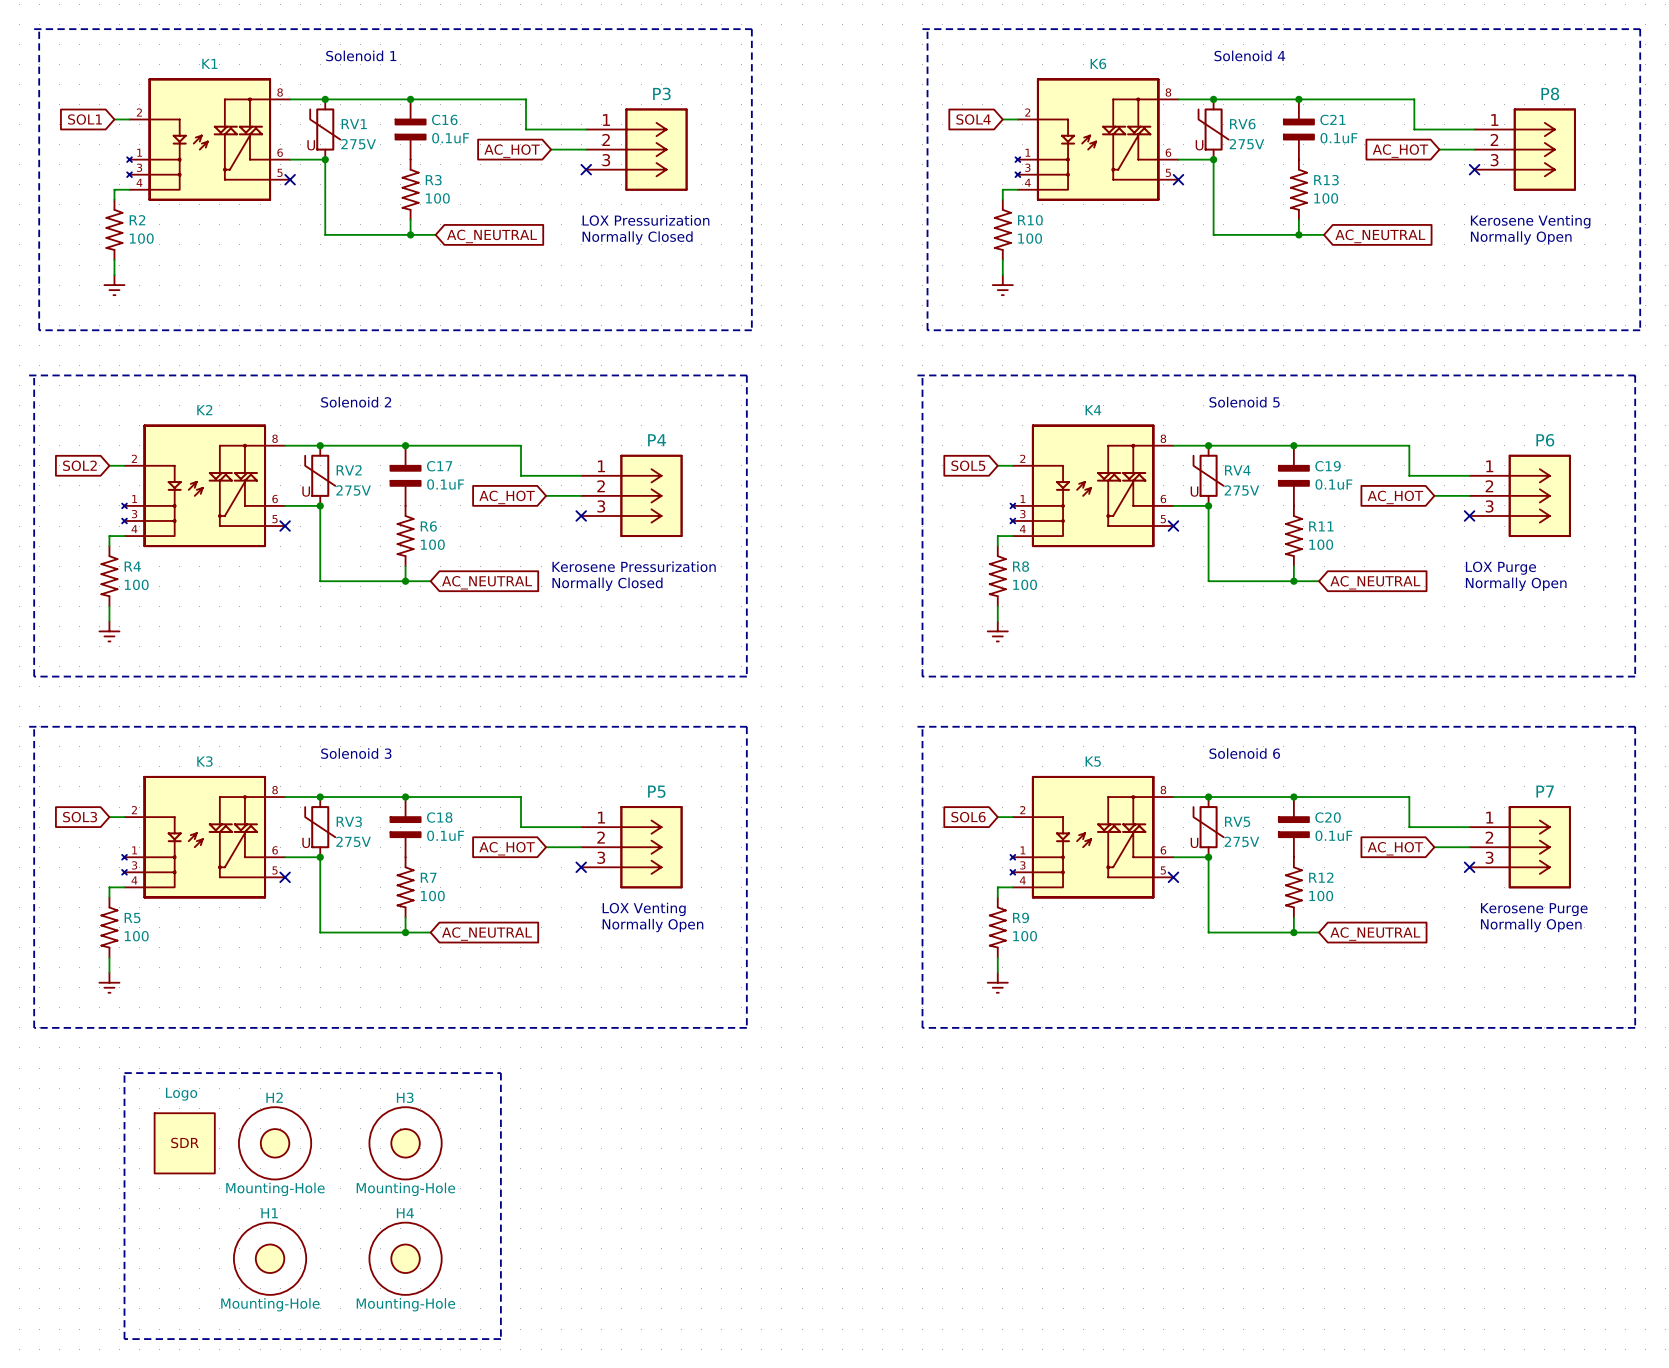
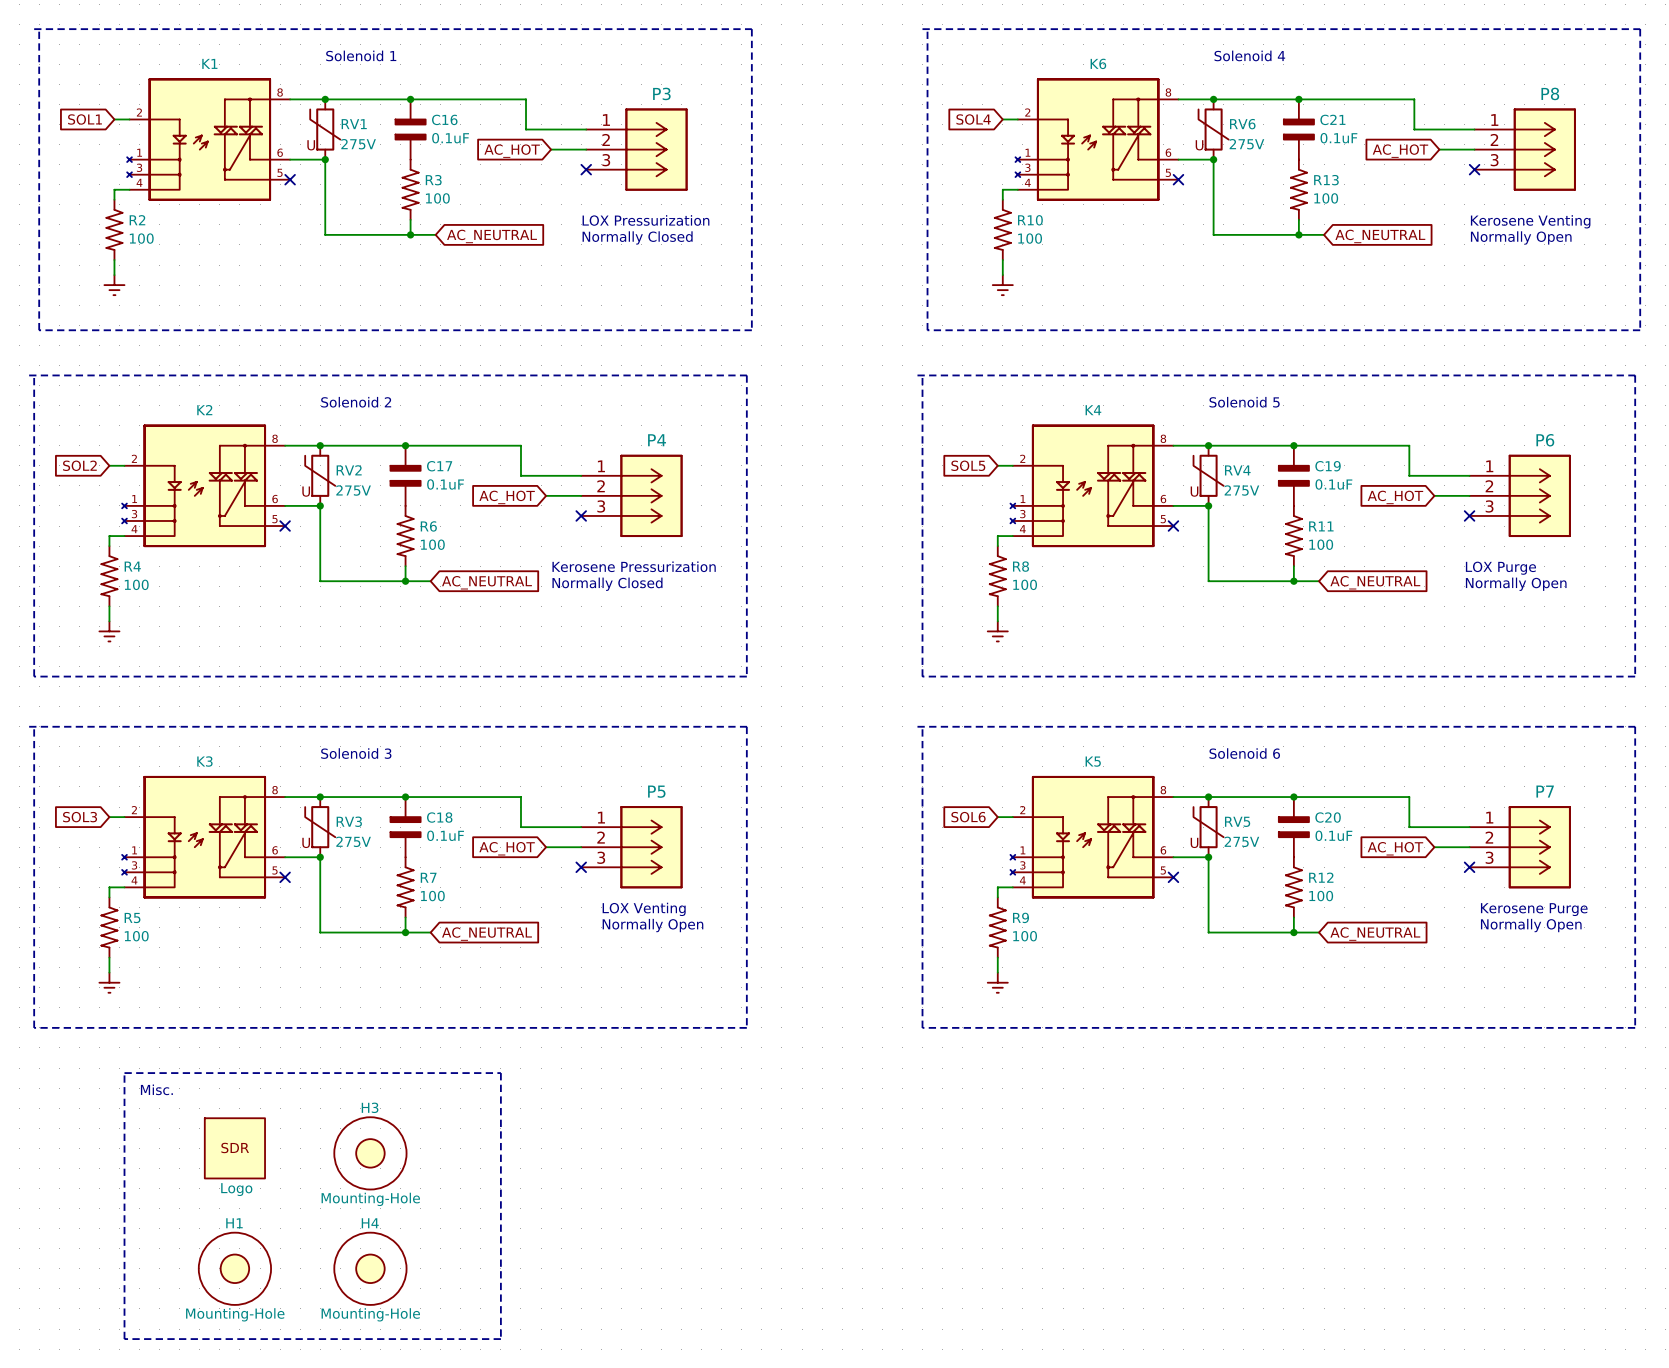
text: none -> Misc. (156, 1089)
part value position: Logo (181, 1094) -> Logo (236, 1189)
part position: (184, 1143) -> (234, 1148)
H2: Mounting-Hole (275, 1143) -> none
H3 position: (405, 1143) -> (370, 1153)
H1 position: (270, 1258) -> (234, 1268)
H4 position: (405, 1258) -> (370, 1268)

